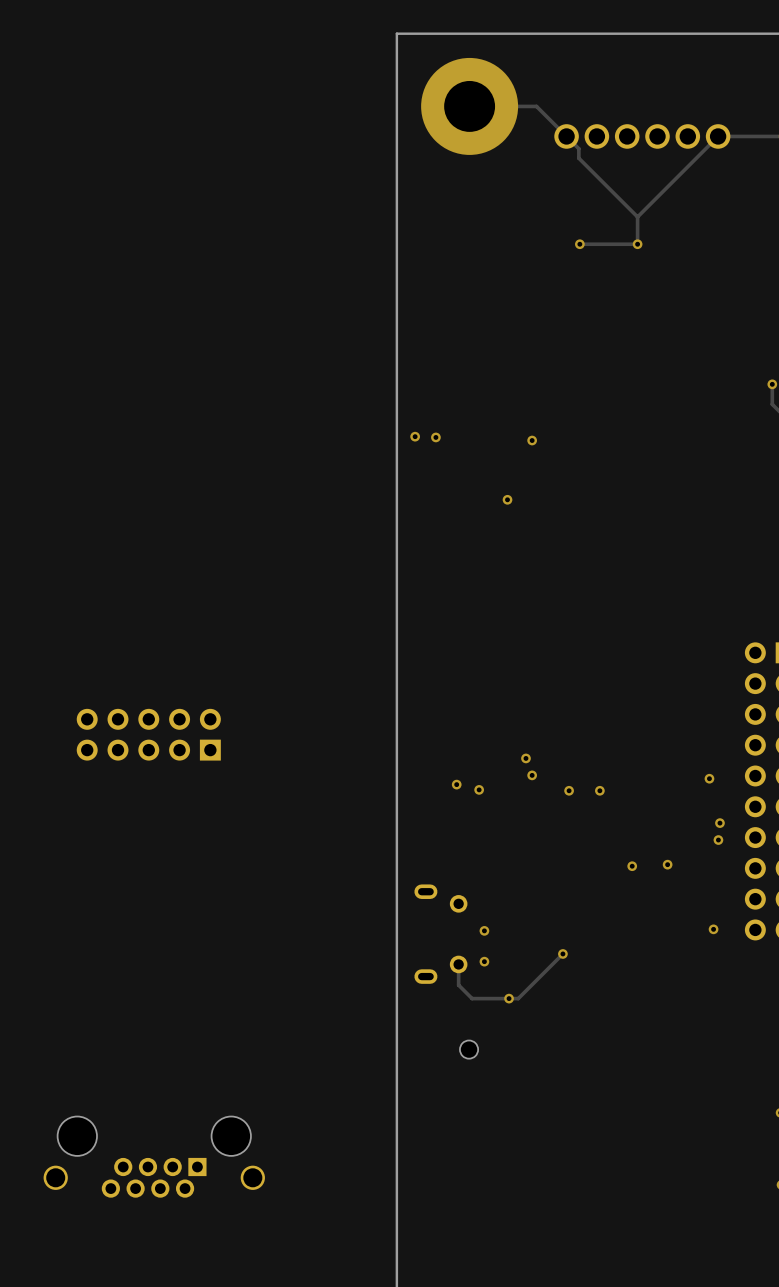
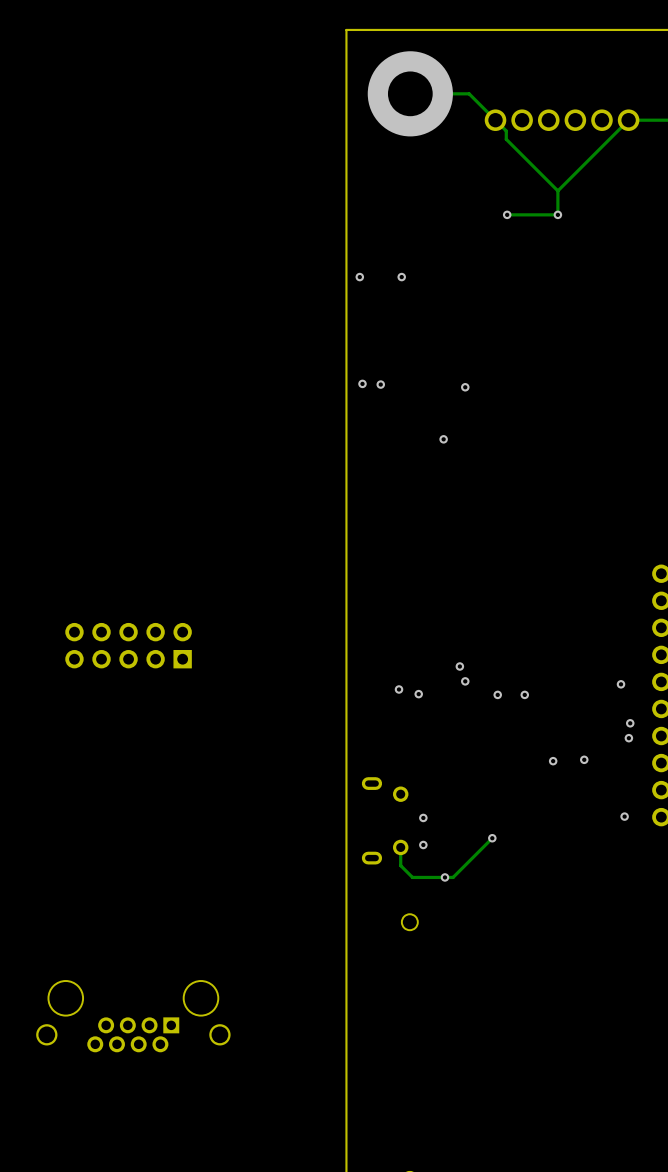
via: none -> (359, 277)
via: none -> (401, 277)

